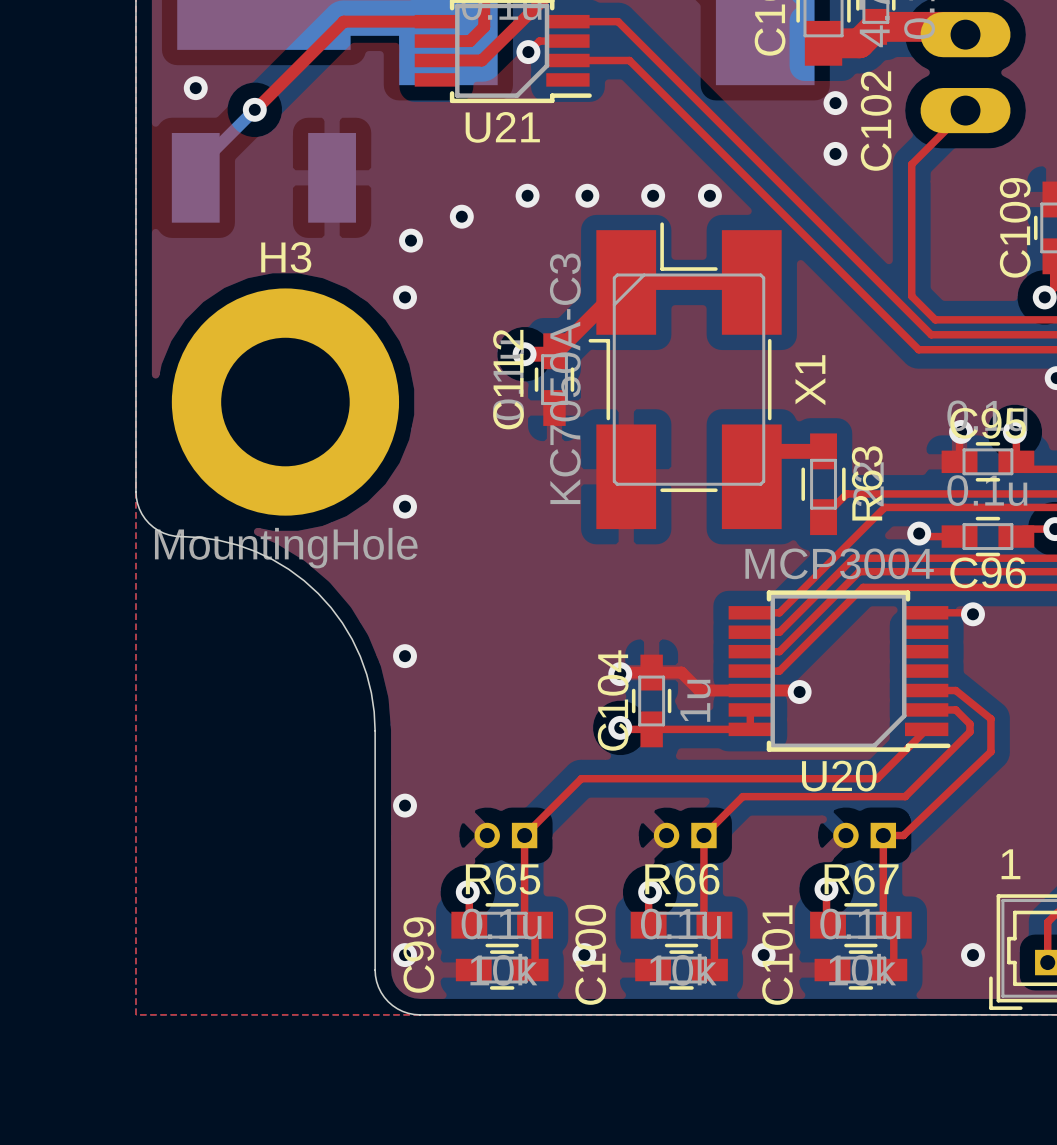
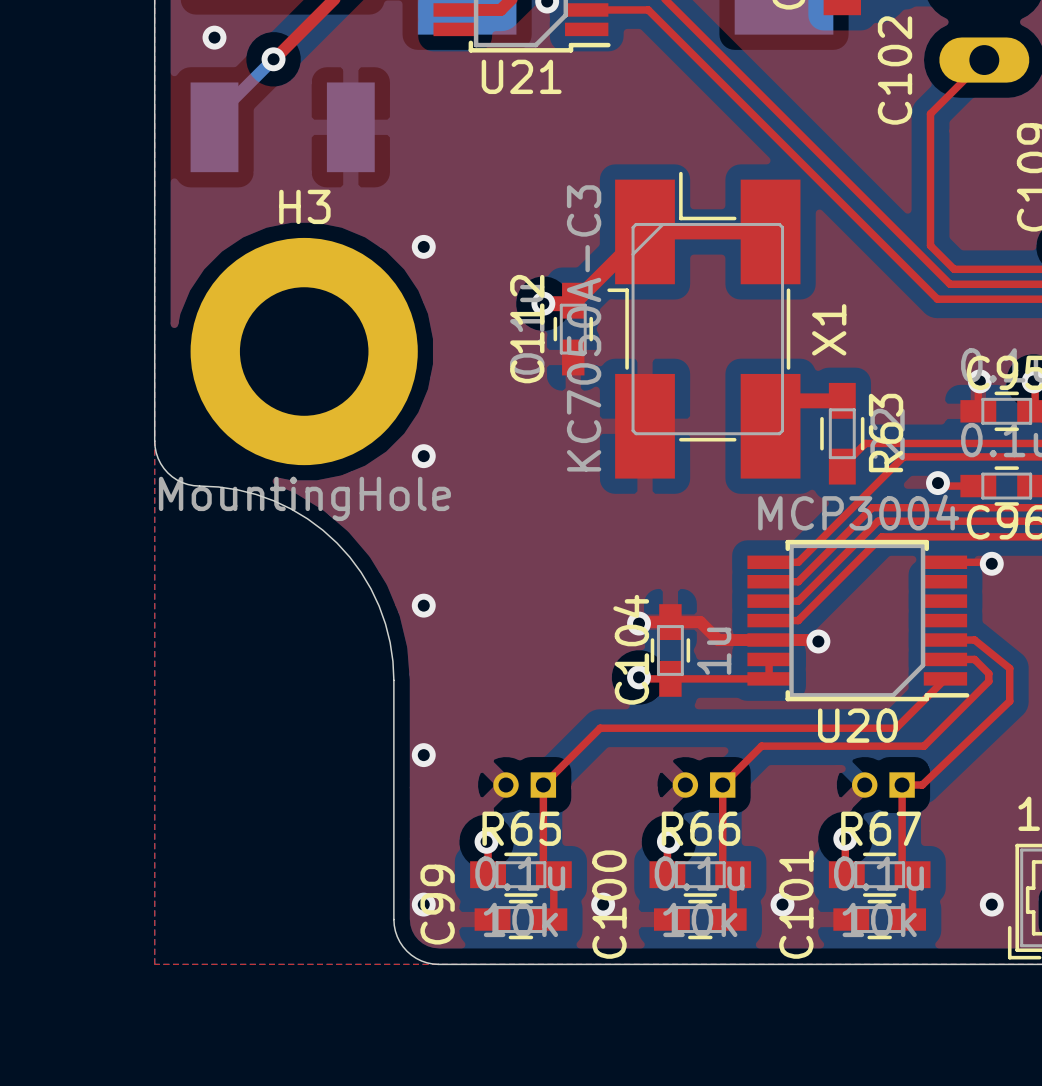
via: (835, 103) -> none
via: (835, 153) -> none
via: (527, 195) -> none
via: (587, 195) -> none
via: (653, 195) -> none
via: (709, 195) -> none
via: (461, 216) -> none
via: (410, 240) -> none

